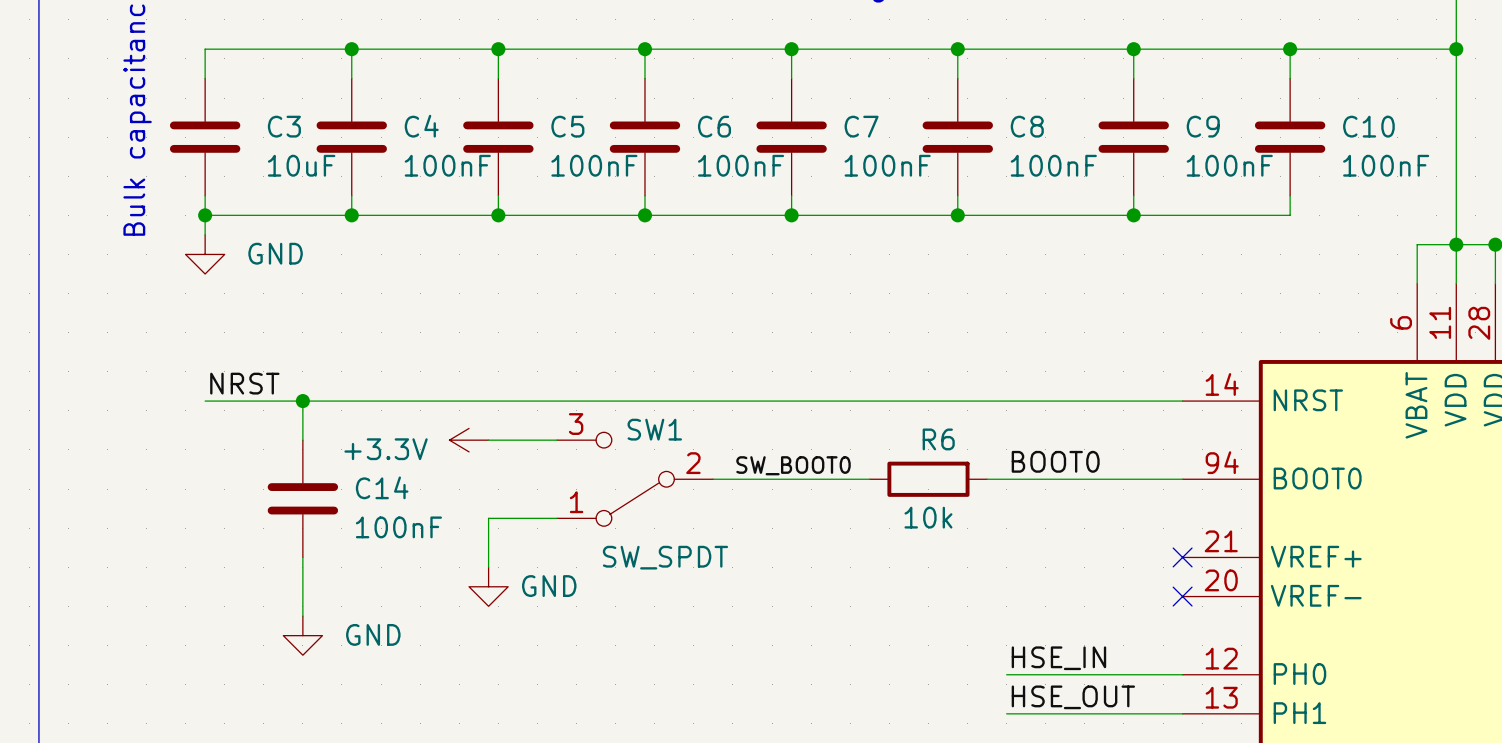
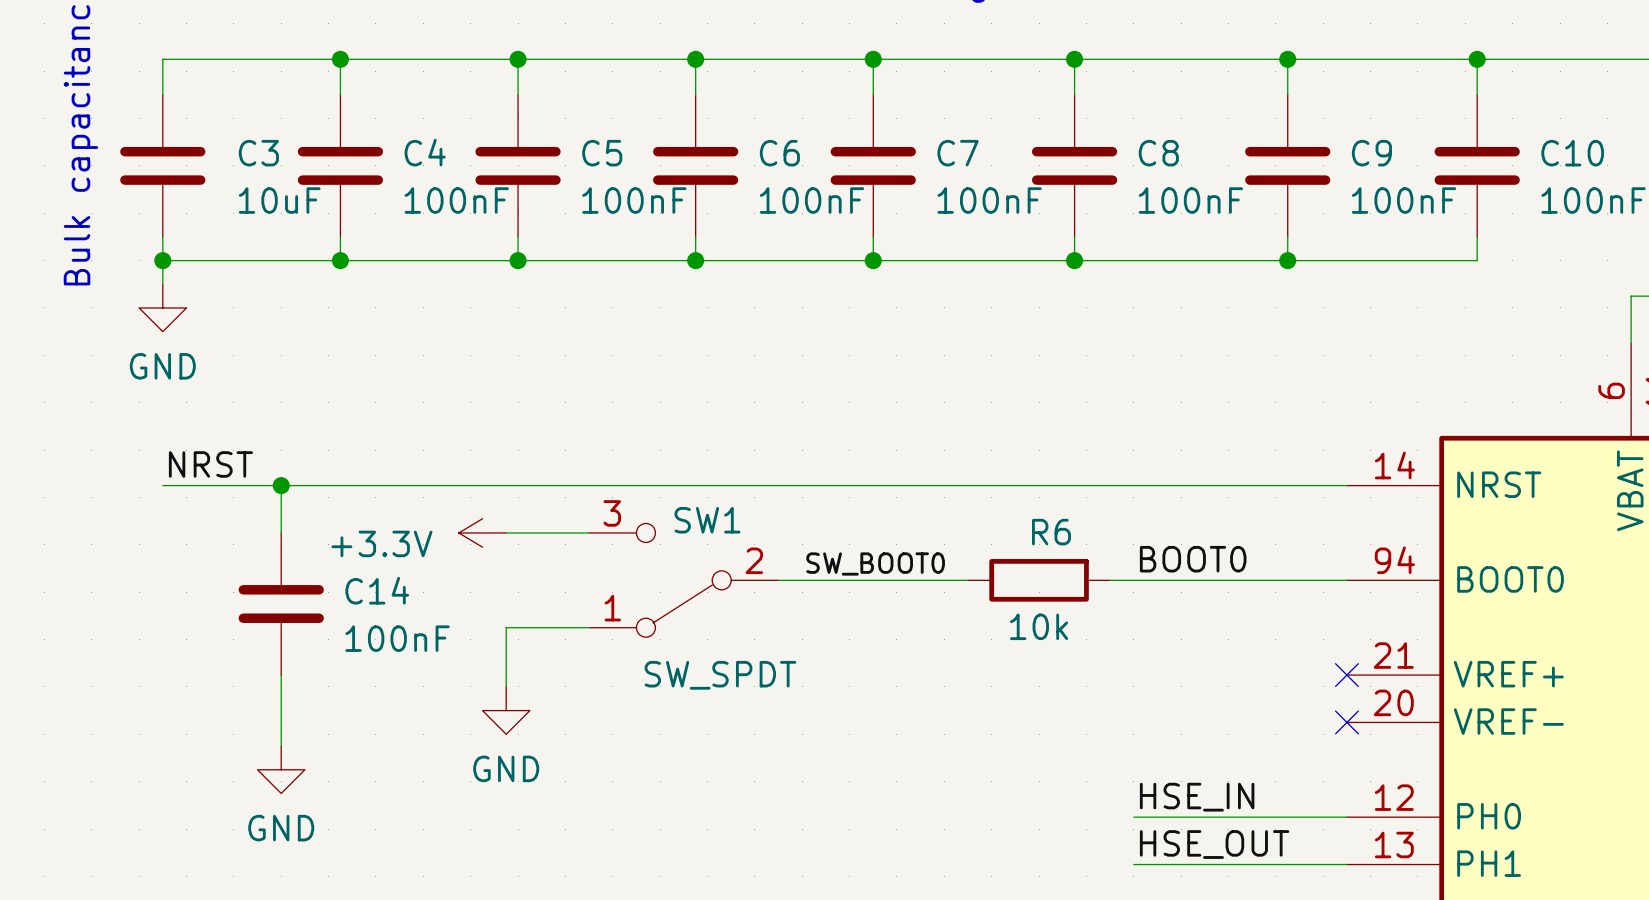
power symbol text position: GND (275, 253) -> GND (162, 366)
power symbol text position: GND (549, 586) -> GND (506, 768)
power symbol text position: GND (373, 634) -> GND (281, 828)

